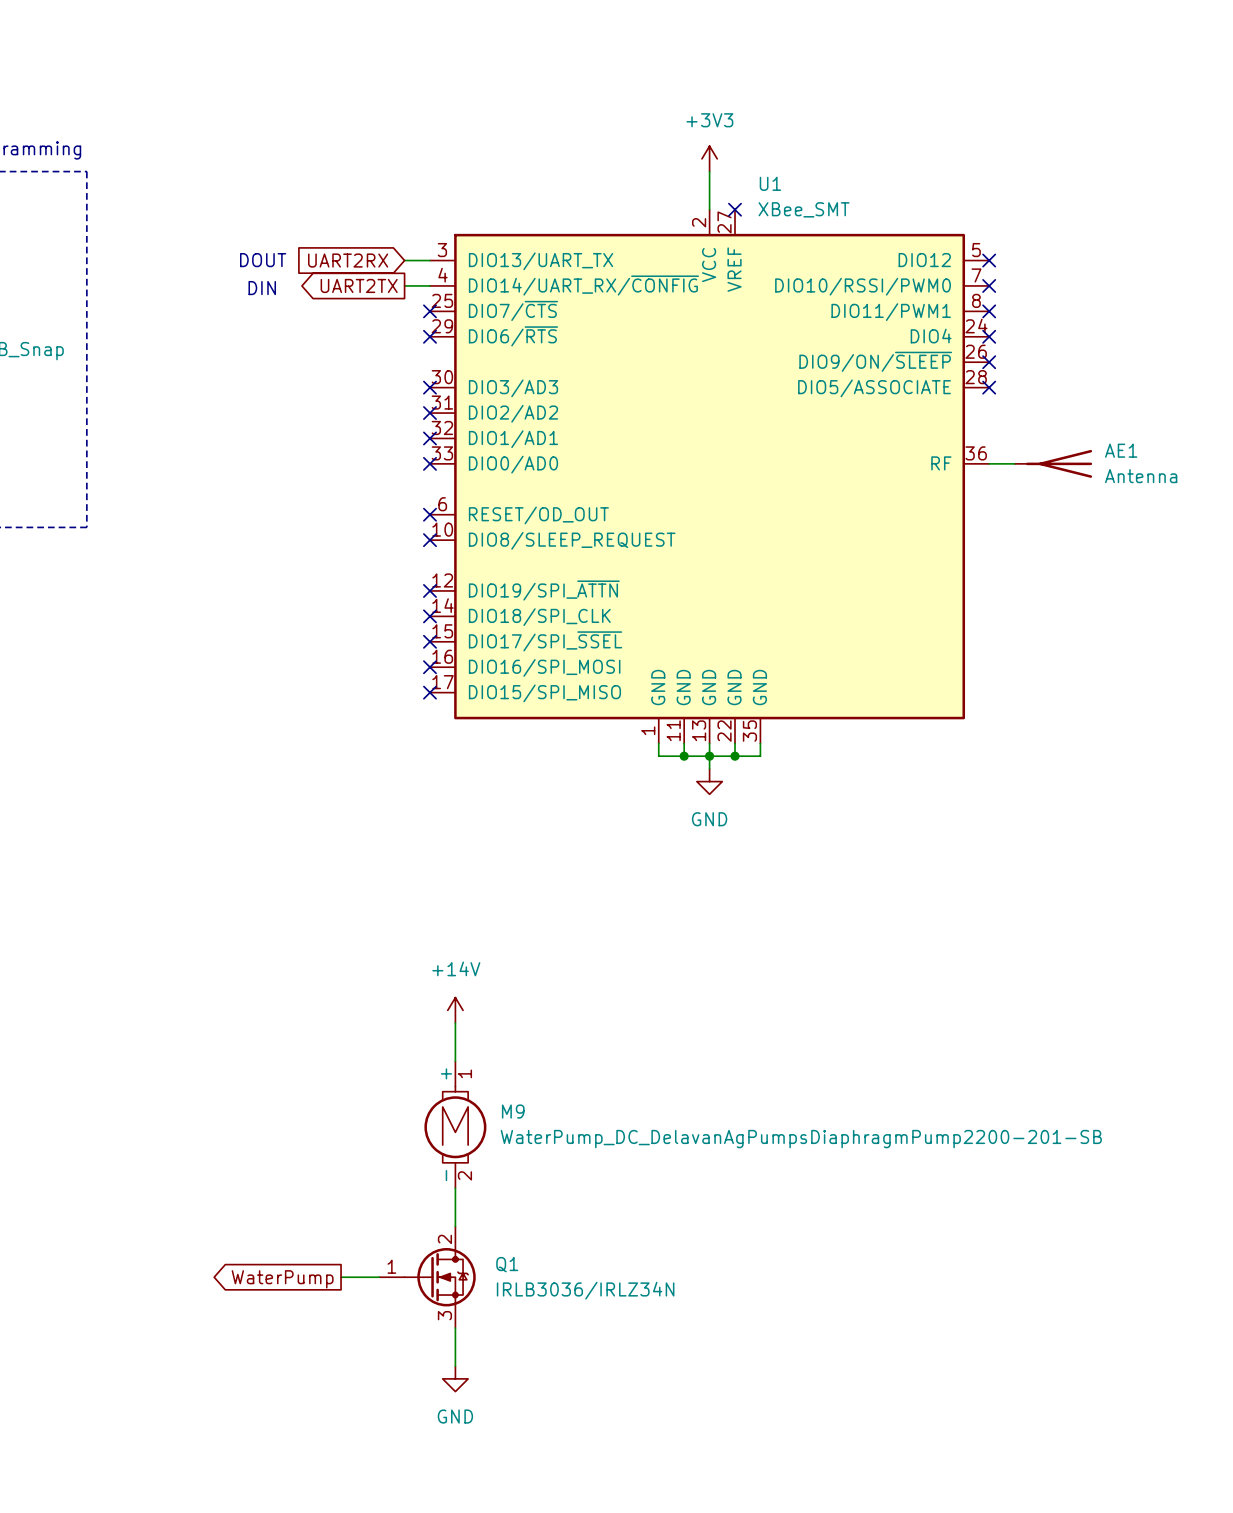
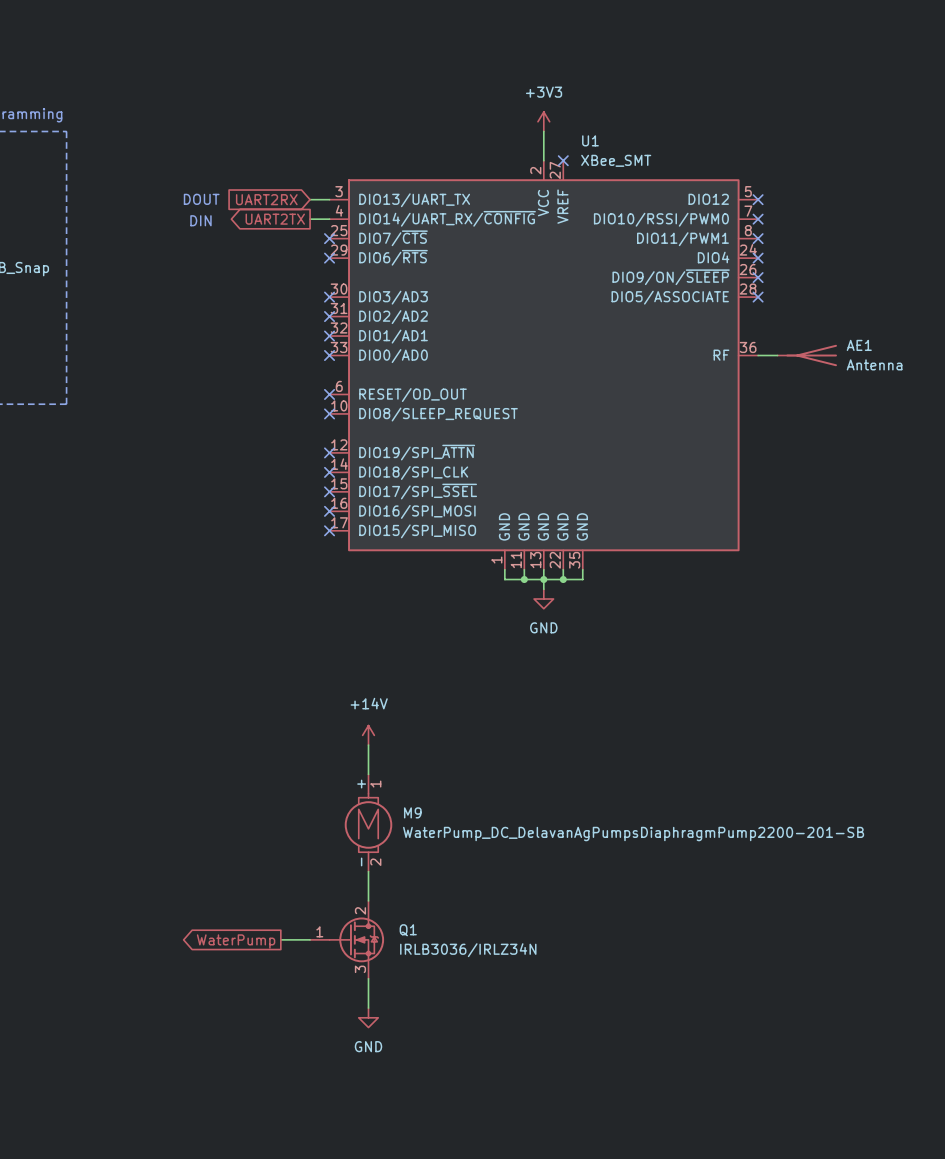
power symbol position: +14V (455, 1010) -> +14V (368, 735)
wire: (455, 1023) (455, 1061) -> (368, 745) (368, 774)
M9 position: (455, 1124) -> (368, 823)
wire: (455, 1188) (455, 1226) -> (368, 871) (368, 900)
wire: (341, 1277) (379, 1277) -> (280, 939) (310, 939)
Q1 position: (427, 1277) -> (347, 939)
global label position: WaterPump (282, 1279) -> WaterPump (236, 941)
wire: (455, 1328) (455, 1366) -> (368, 978) (368, 1008)
power symbol position: GND (455, 1378) -> GND (368, 1017)

